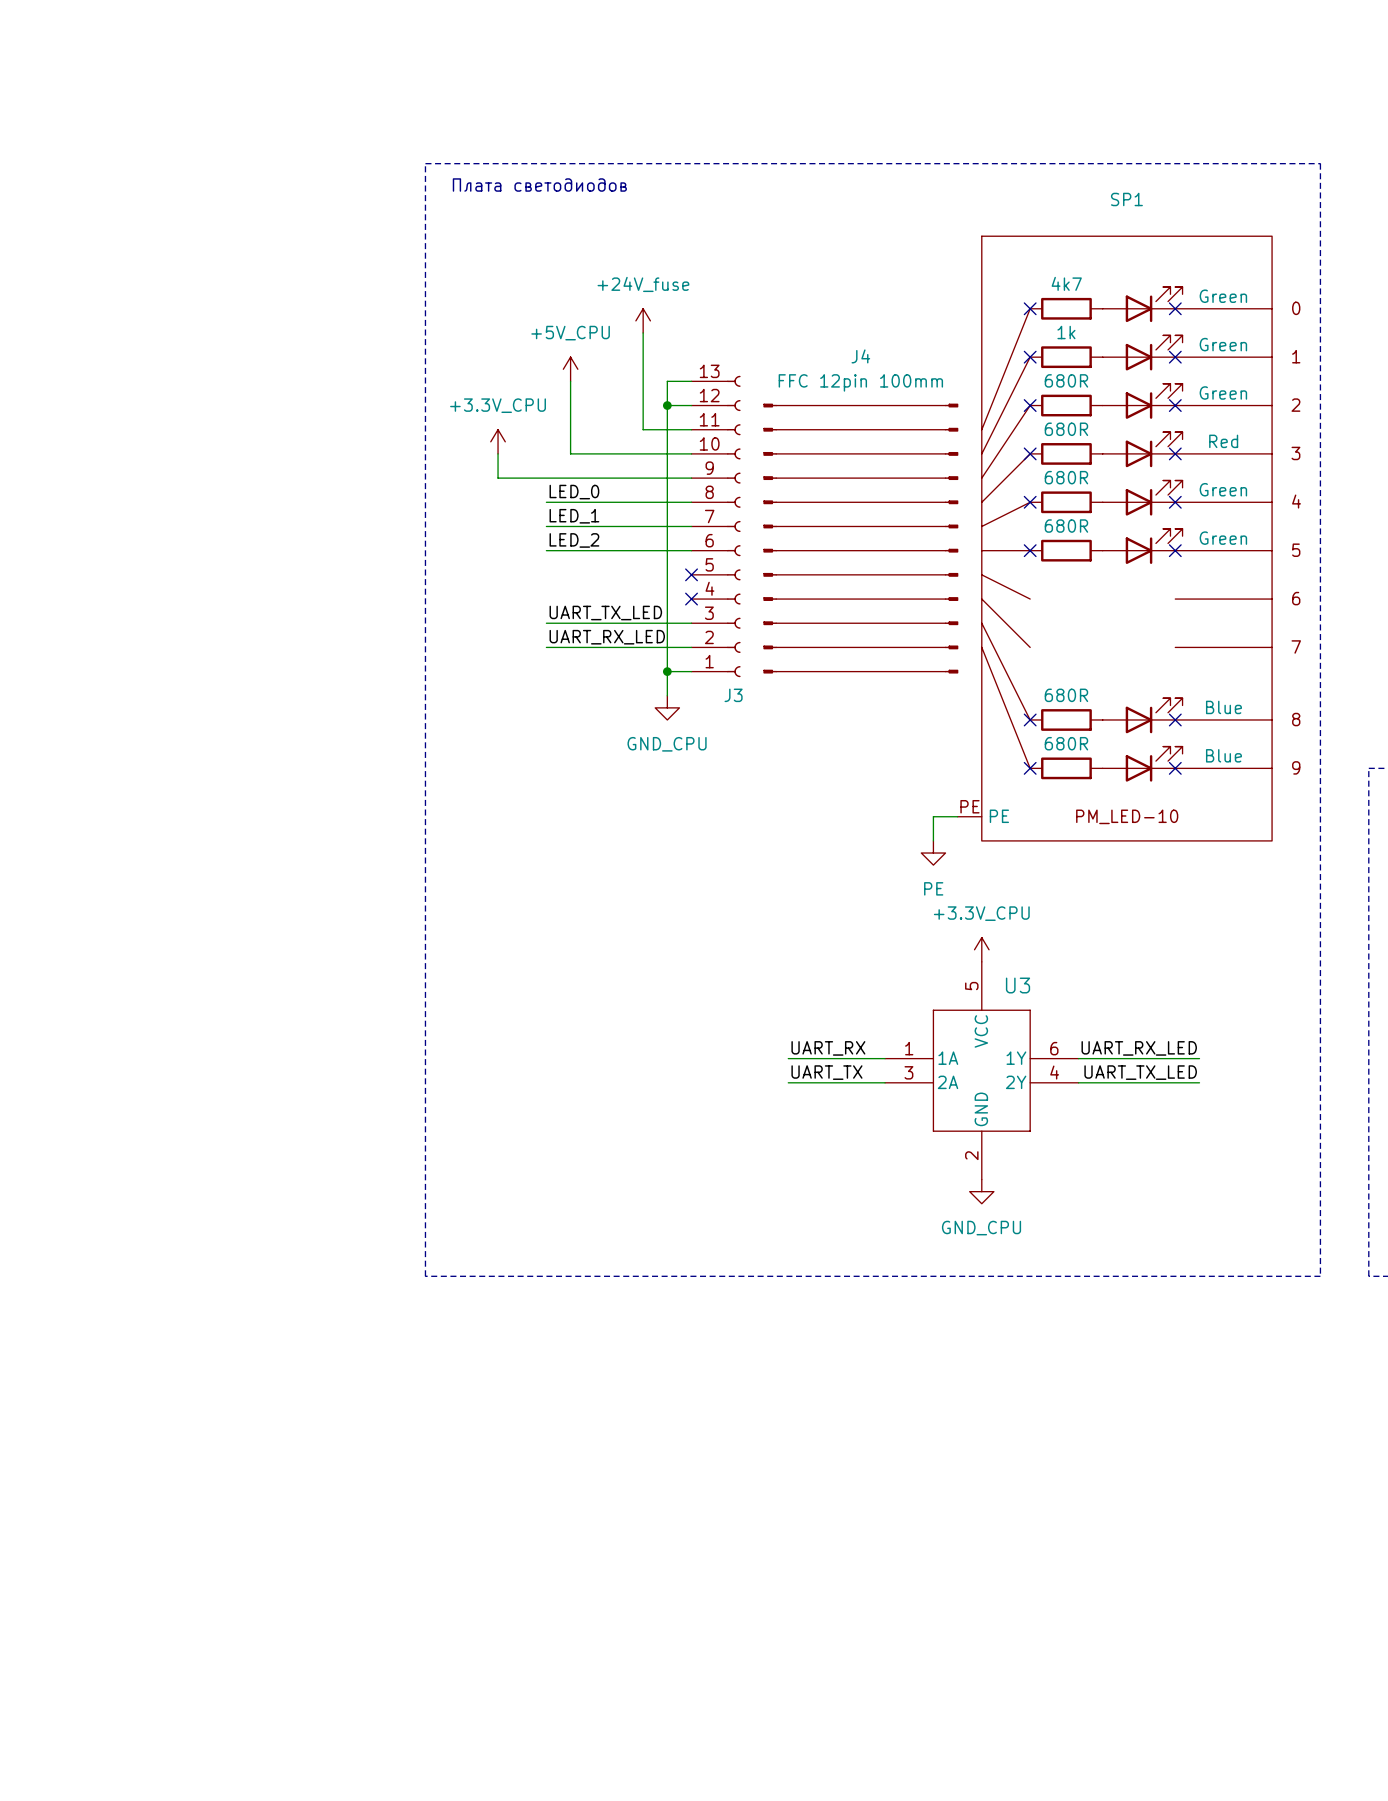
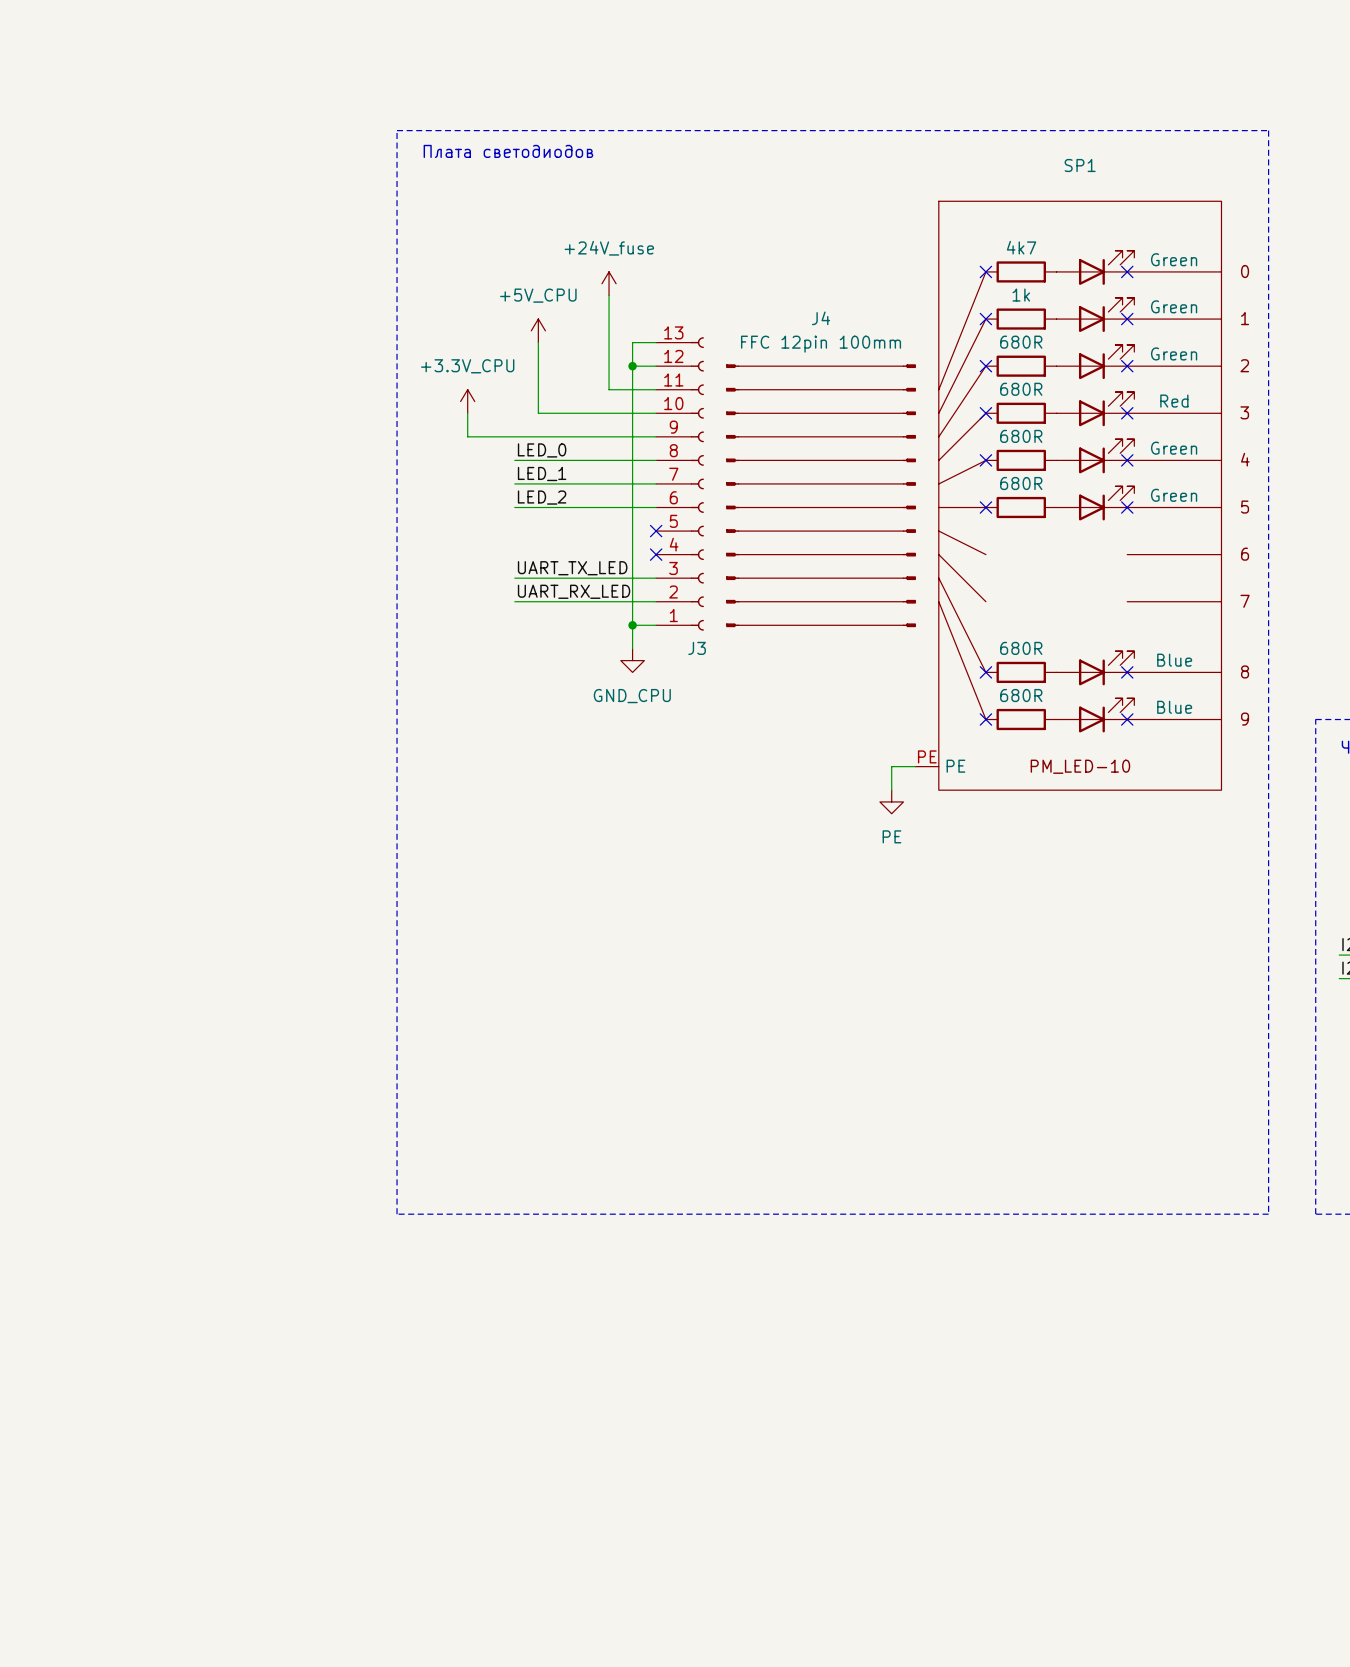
power symbol: +3.3V_CPU (981, 949) -> none
label: UART_RX (828, 1048) -> none
label: UART_RX_LED (1139, 1048) -> none
wire: (788, 1058) (885, 1058) -> none
wire: (1078, 1058) (1199, 1058) -> none
U3: (981, 1070) -> none
label: UART_TX (826, 1072) -> none
label: UART_TX_LED (1140, 1072) -> none
wire: (788, 1082) (885, 1082) -> none
wire: (1078, 1082) (1199, 1082) -> none
power symbol: GND_CPU (981, 1191) -> none

